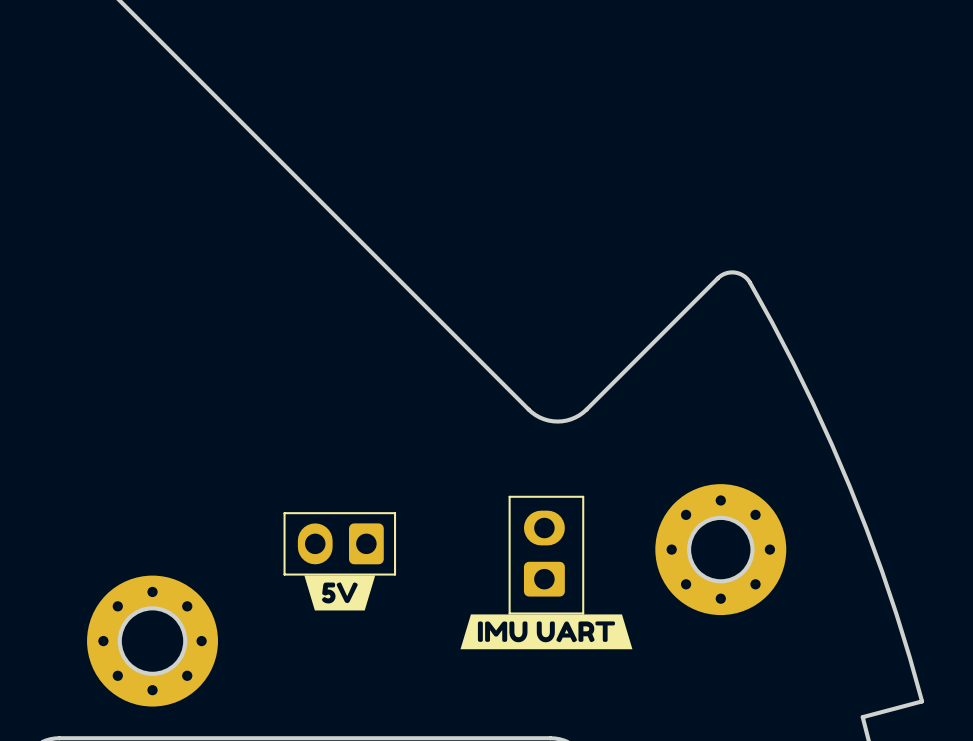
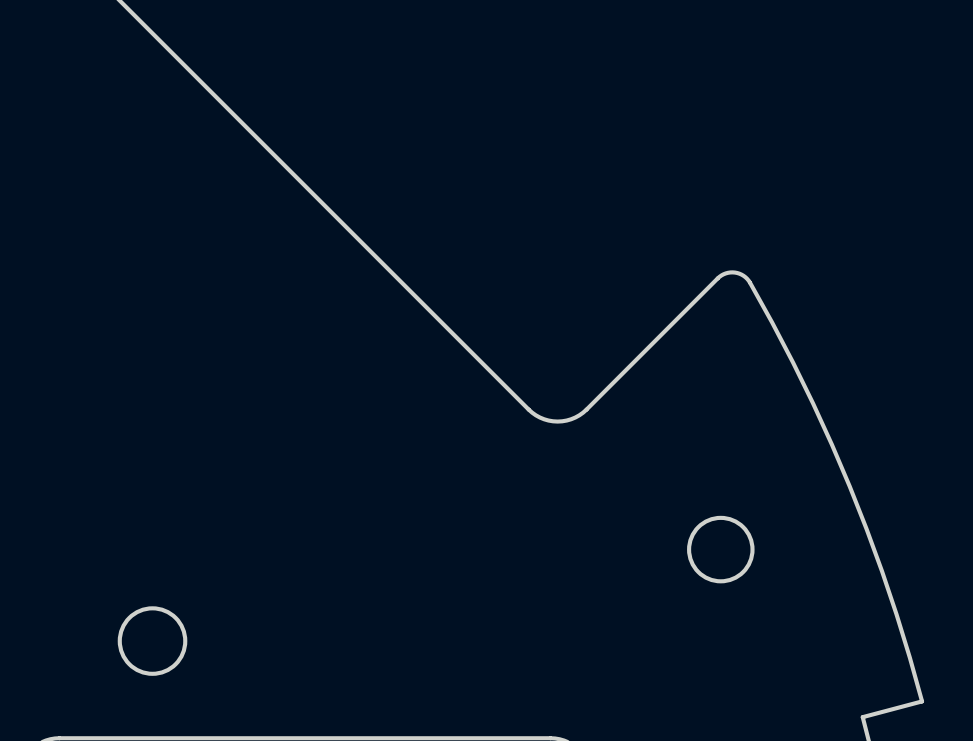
line: (583, 496) (509, 496) (509, 613) (583, 613) (583, 496) -> none
line: (395, 513) (284, 513) (284, 574) (395, 574) (395, 513) -> none
part: (340, 543) -> none
part: (720, 549) -> none
part: (544, 553) -> none
drawing: [304, 575, 376, 611] -> none
drawing: [460, 614, 633, 650] -> none
part: (152, 641) -> none

